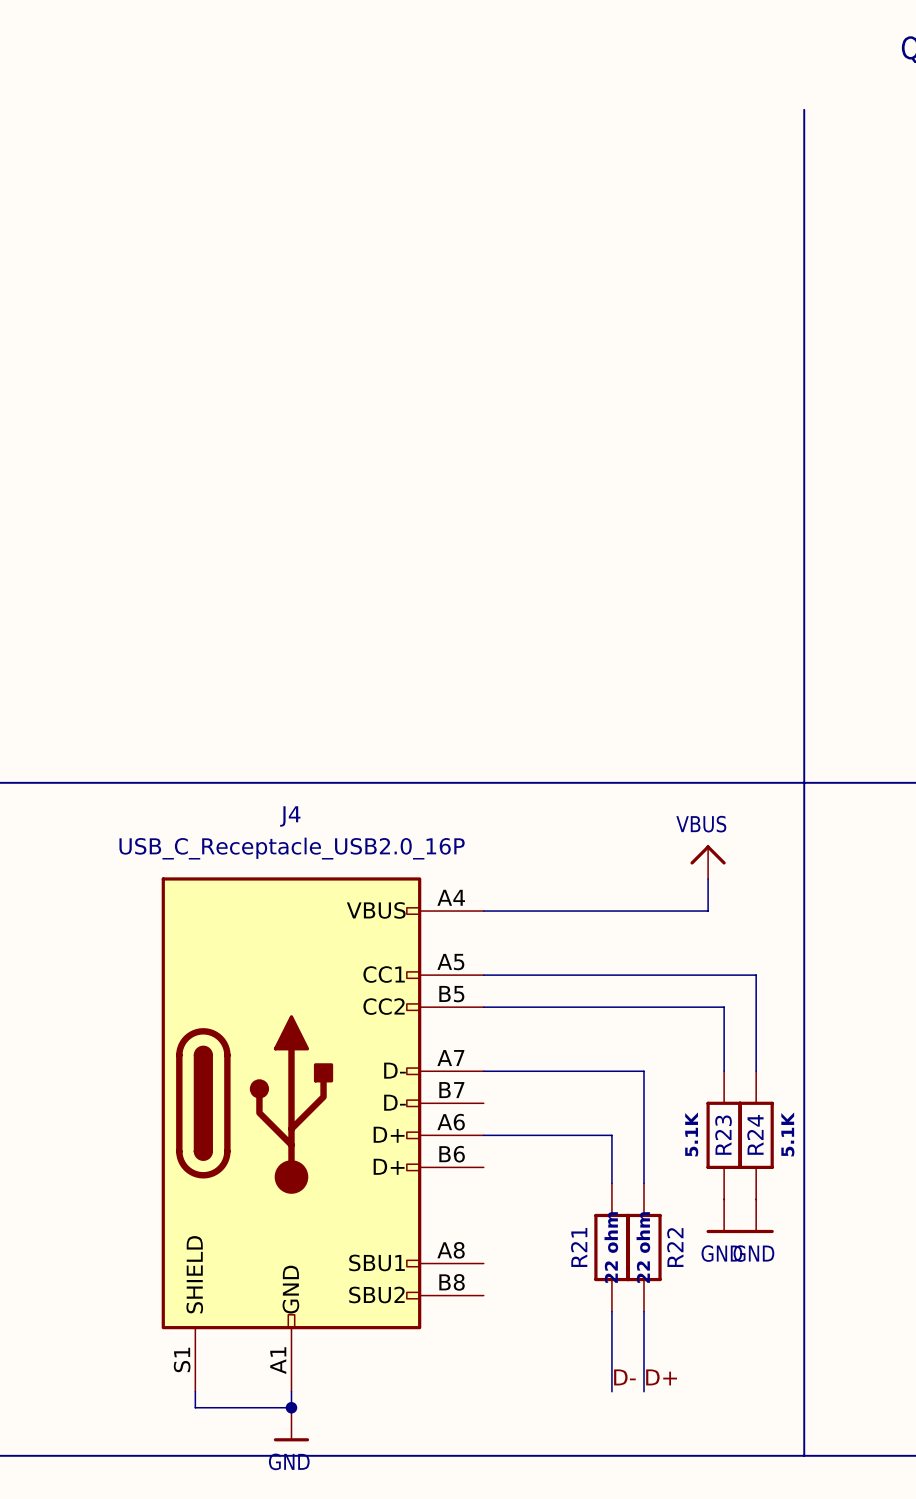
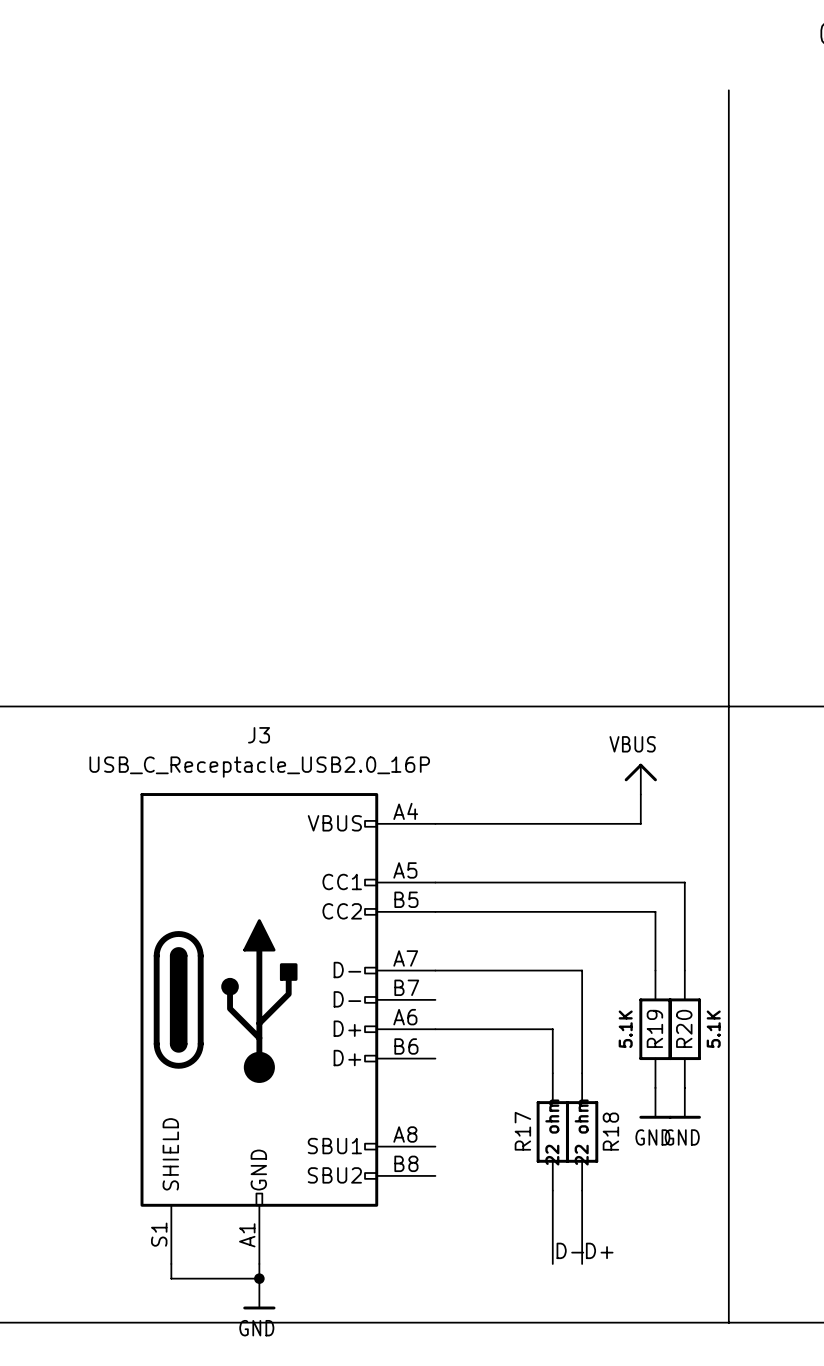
J4 name: J4 (290, 816) -> J3 (259, 735)
R24 name: R24 (755, 1134) -> R20 (684, 1028)
R23 name: R23 (723, 1135) -> R19 (654, 1028)
R21 name: R21 (579, 1247) -> R17 (522, 1131)
R22 name: R22 (675, 1247) -> R18 (610, 1131)

